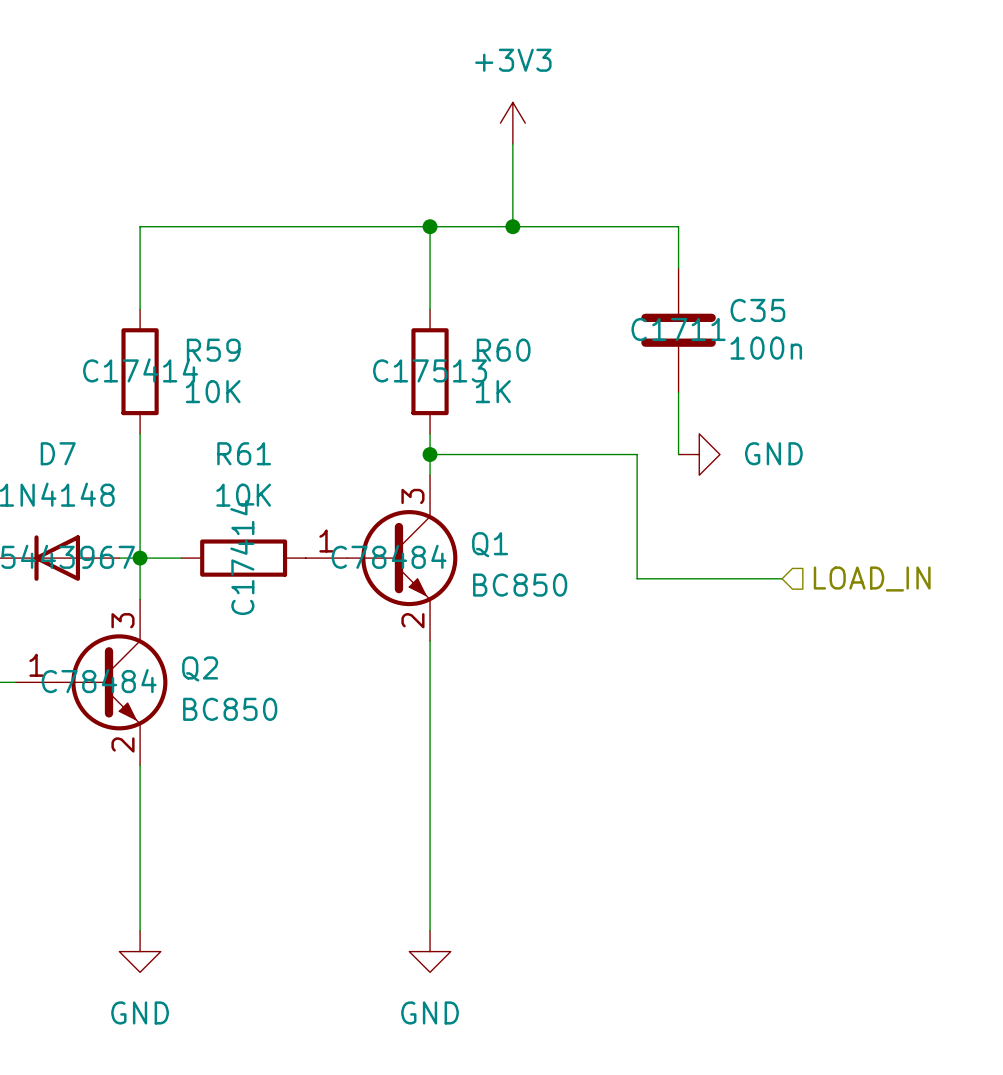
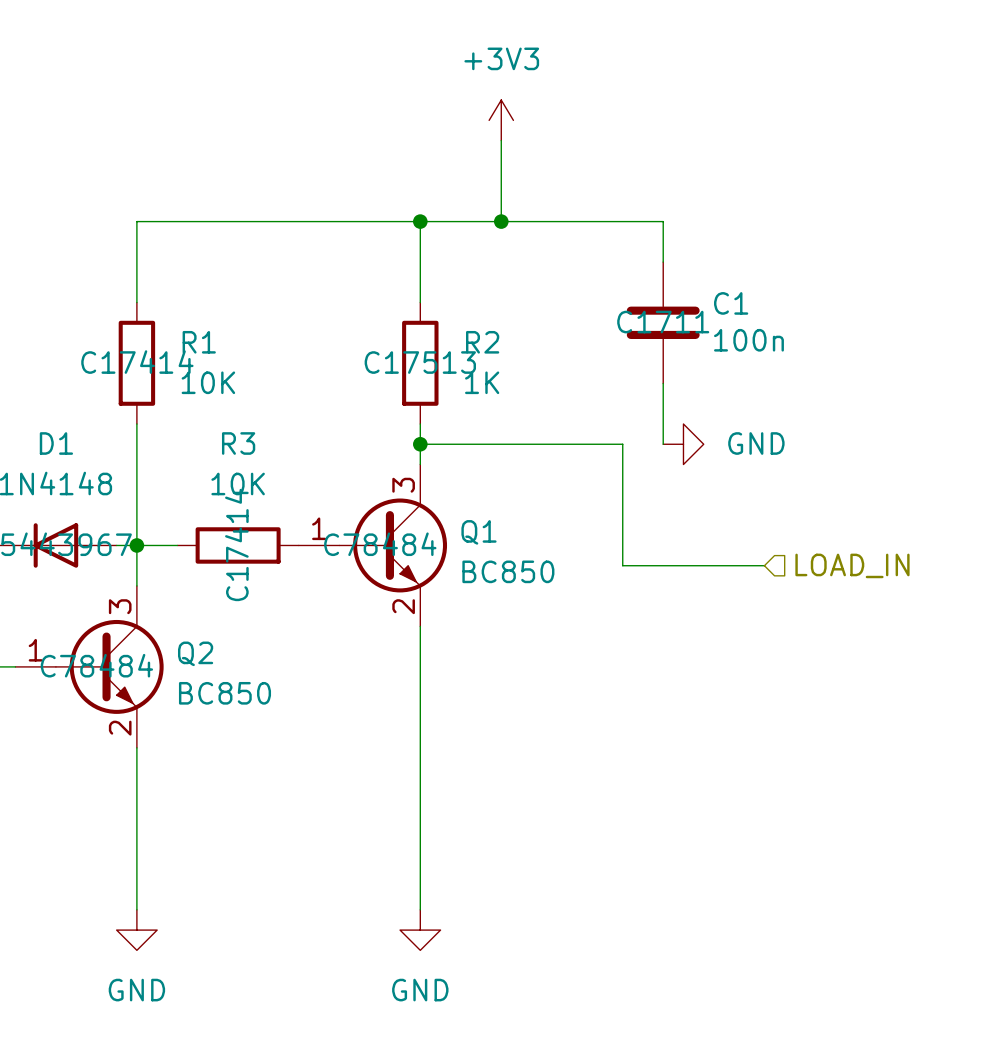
C35 name: C35 (757, 310) -> C1 (731, 303)
R59 name: R59 (213, 350) -> R1 (199, 342)
R60 name: R60 (503, 350) -> R2 (482, 342)
D7 name: D7 (58, 453) -> D1 (56, 443)
R61 name: R61 (244, 453) -> R3 (238, 443)

